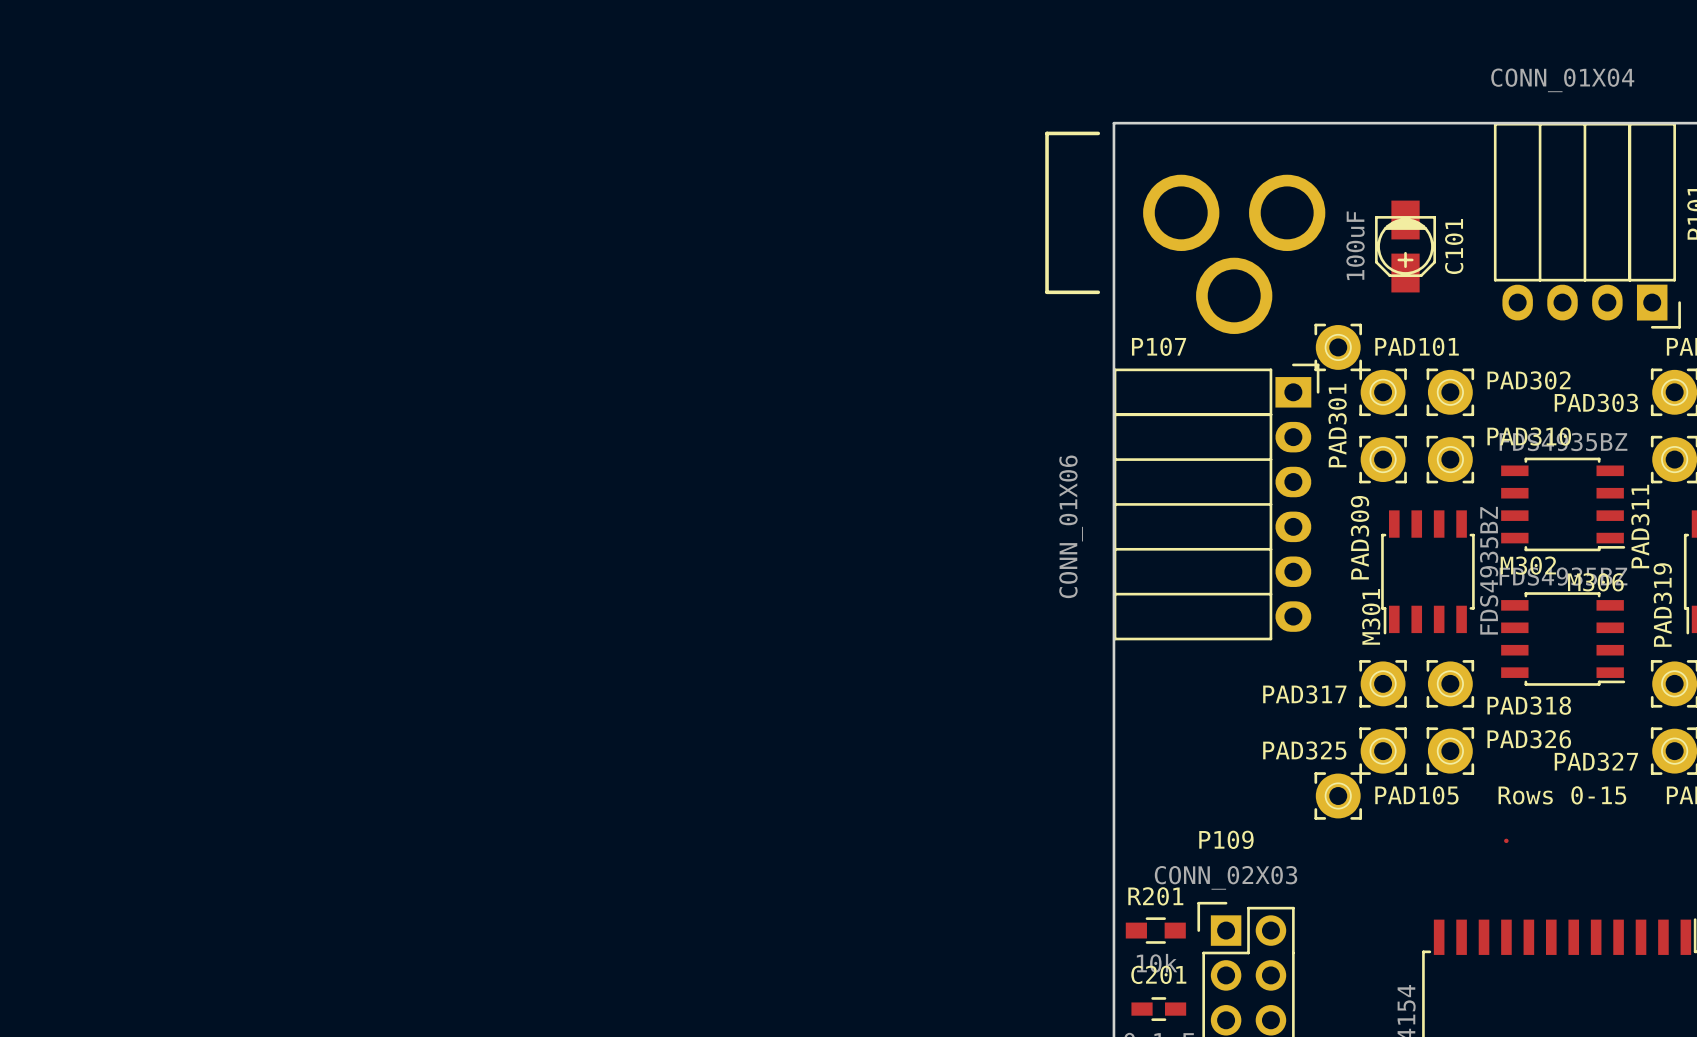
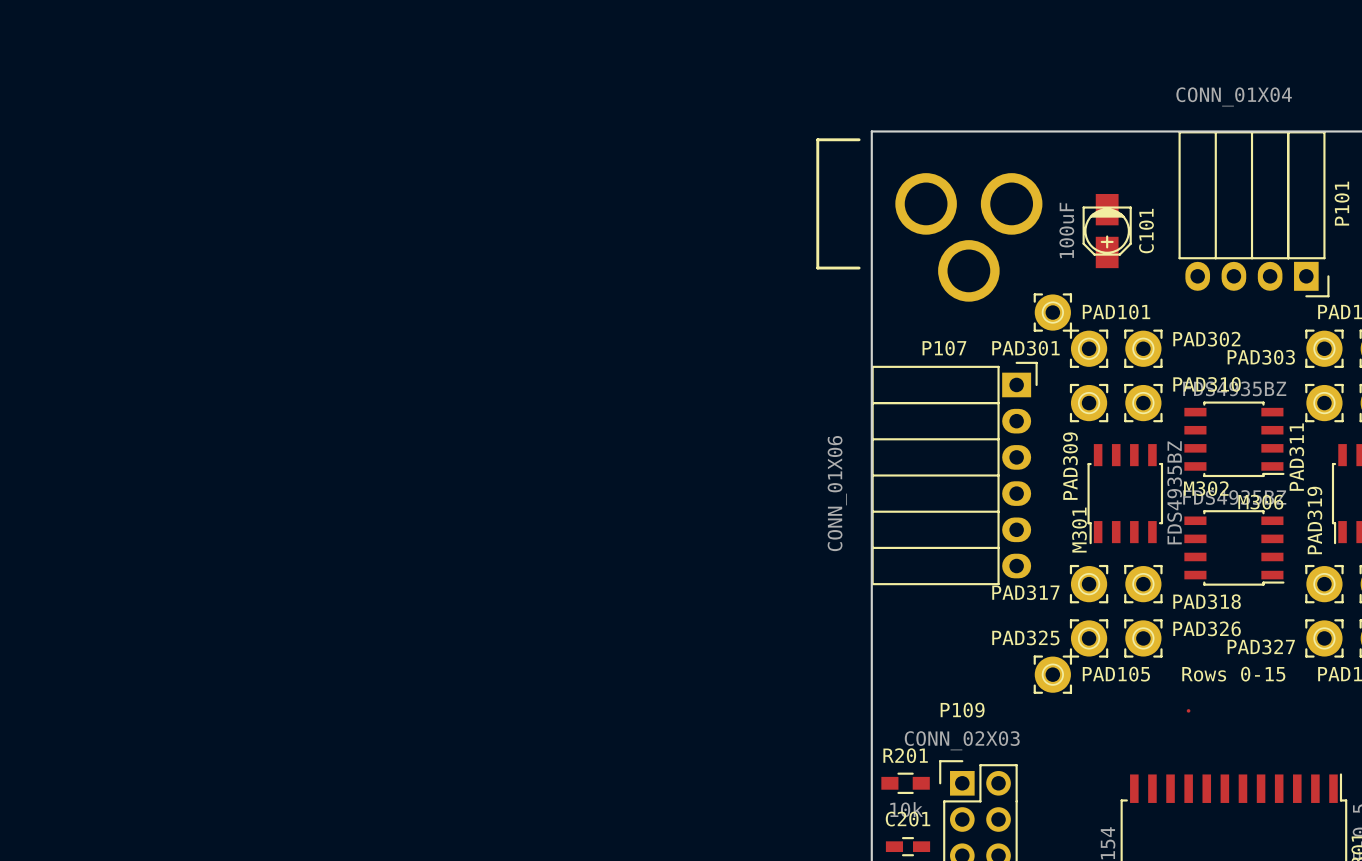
P107 name position: P107 (1159, 346) -> P107 (944, 348)
PAD301 name rotation: 0° (1337, 425) -> 90° clockwise (1025, 348)
P107 position: (1216, 501) -> (954, 473)

